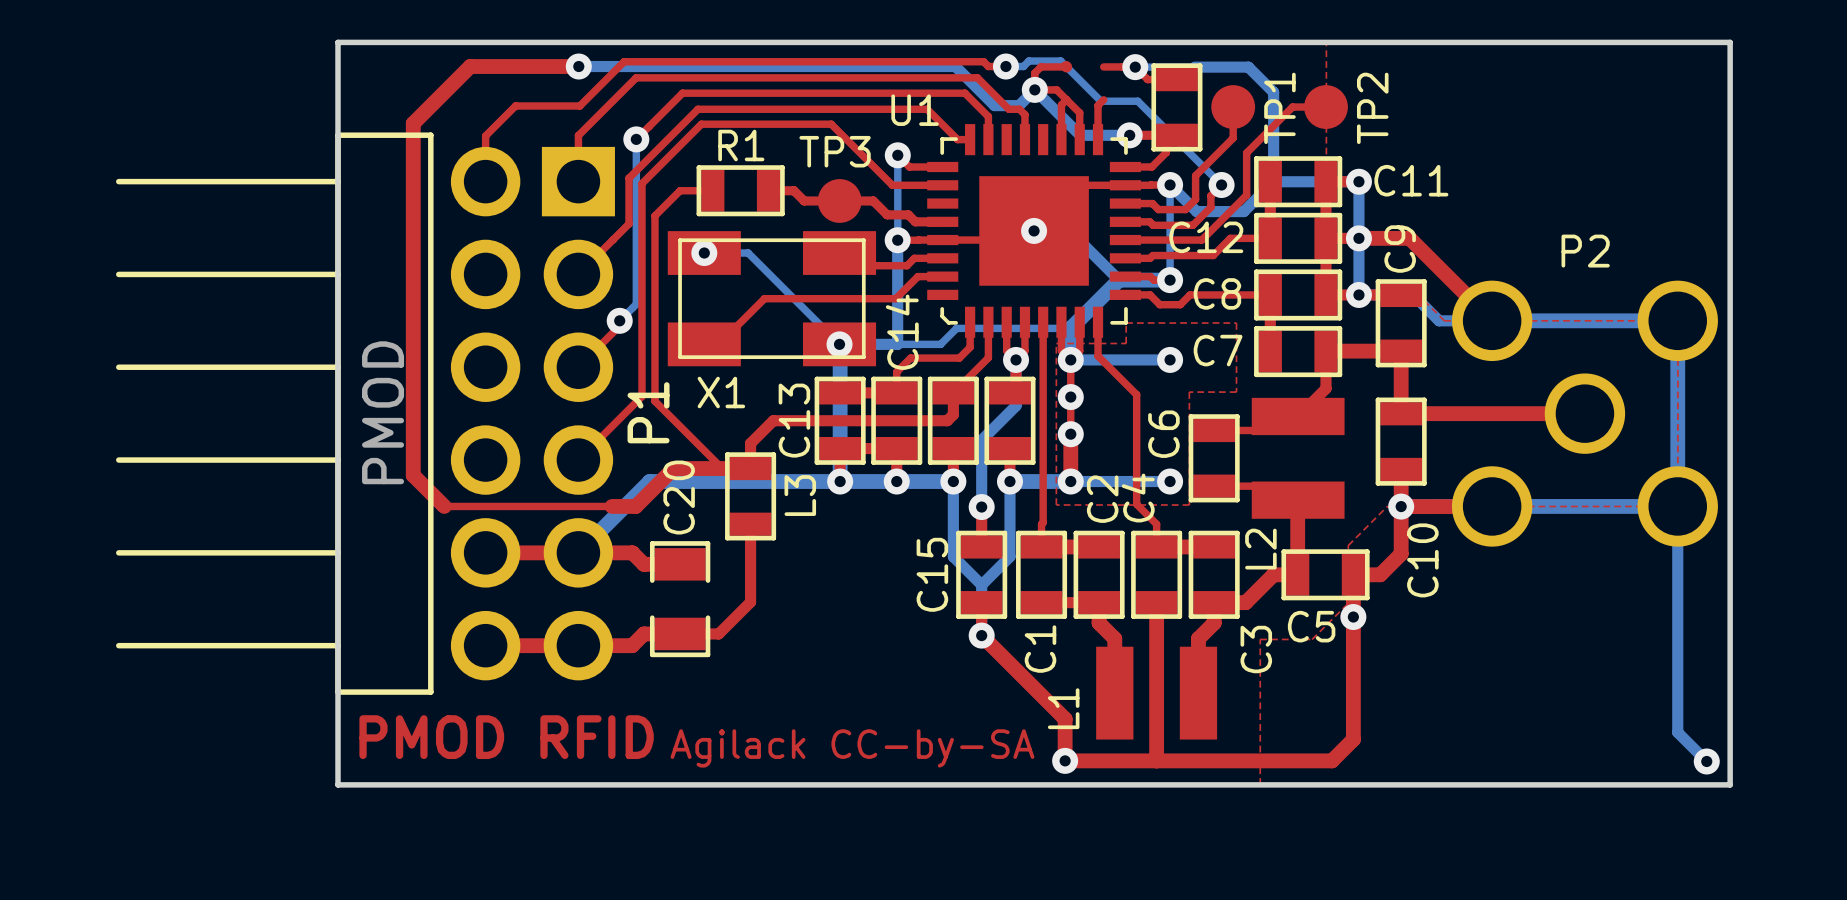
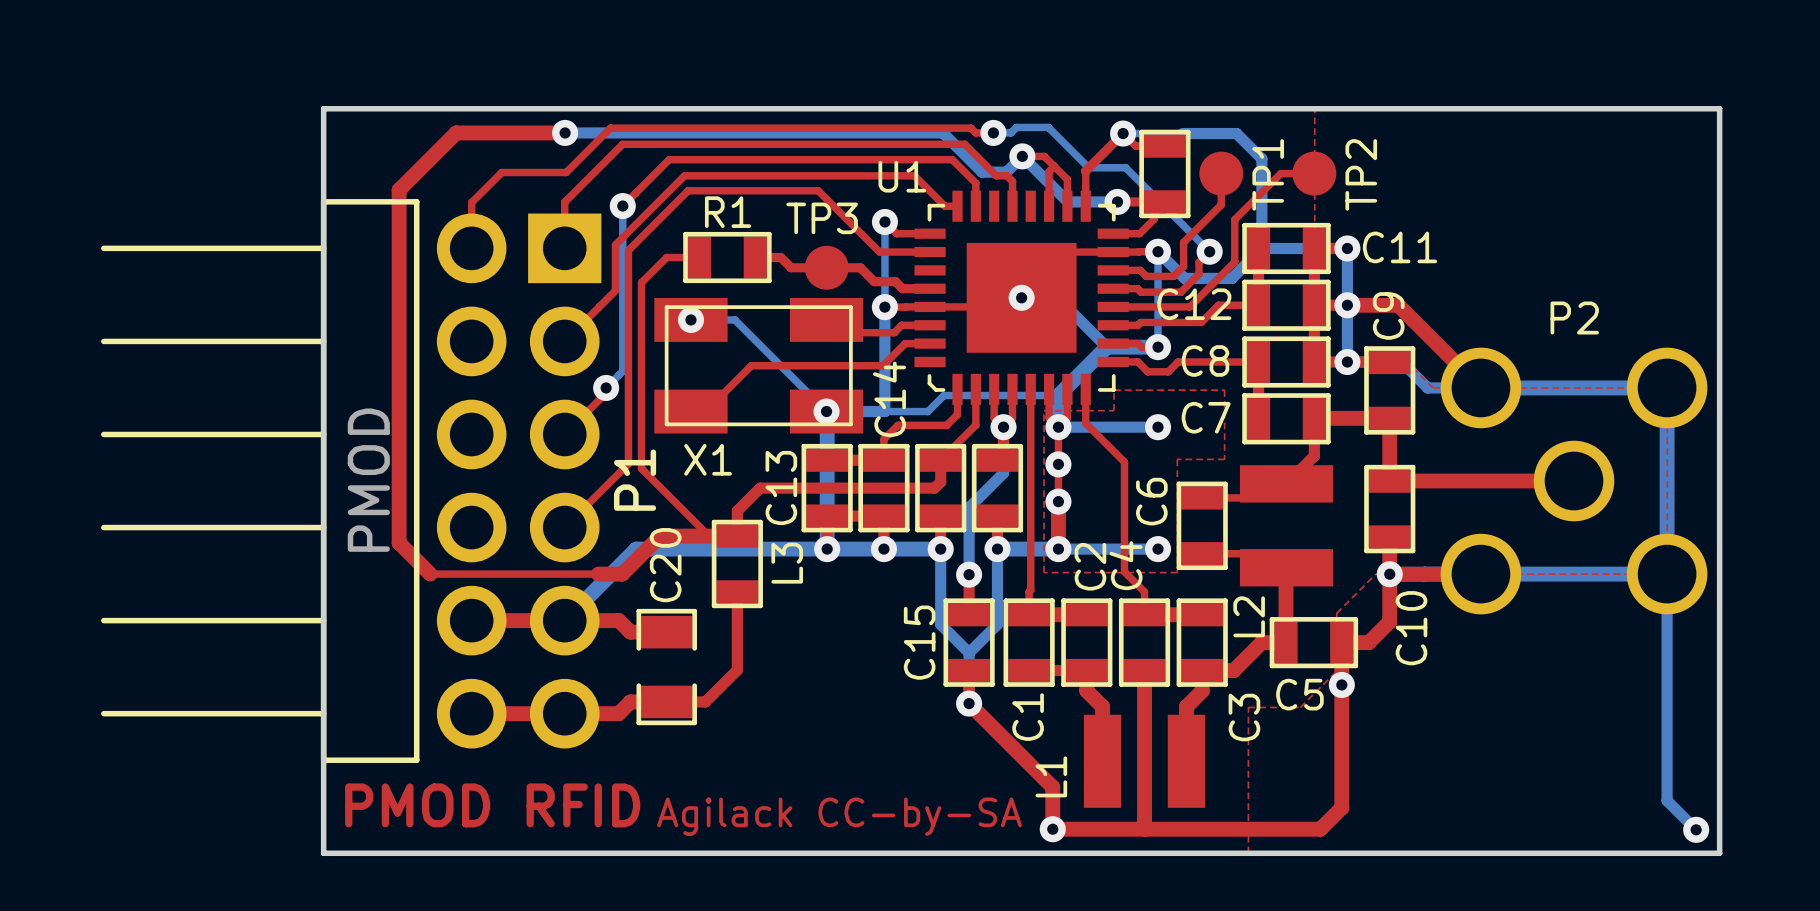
top track: (1066, 66) (1040, 66) (1034, 73) (1034, 89) -> none
top track: (1103, 66) (1122, 66) -> none
top track: (1103, 99) (1098, 105) -> (1123, 133) (1085, 172)

